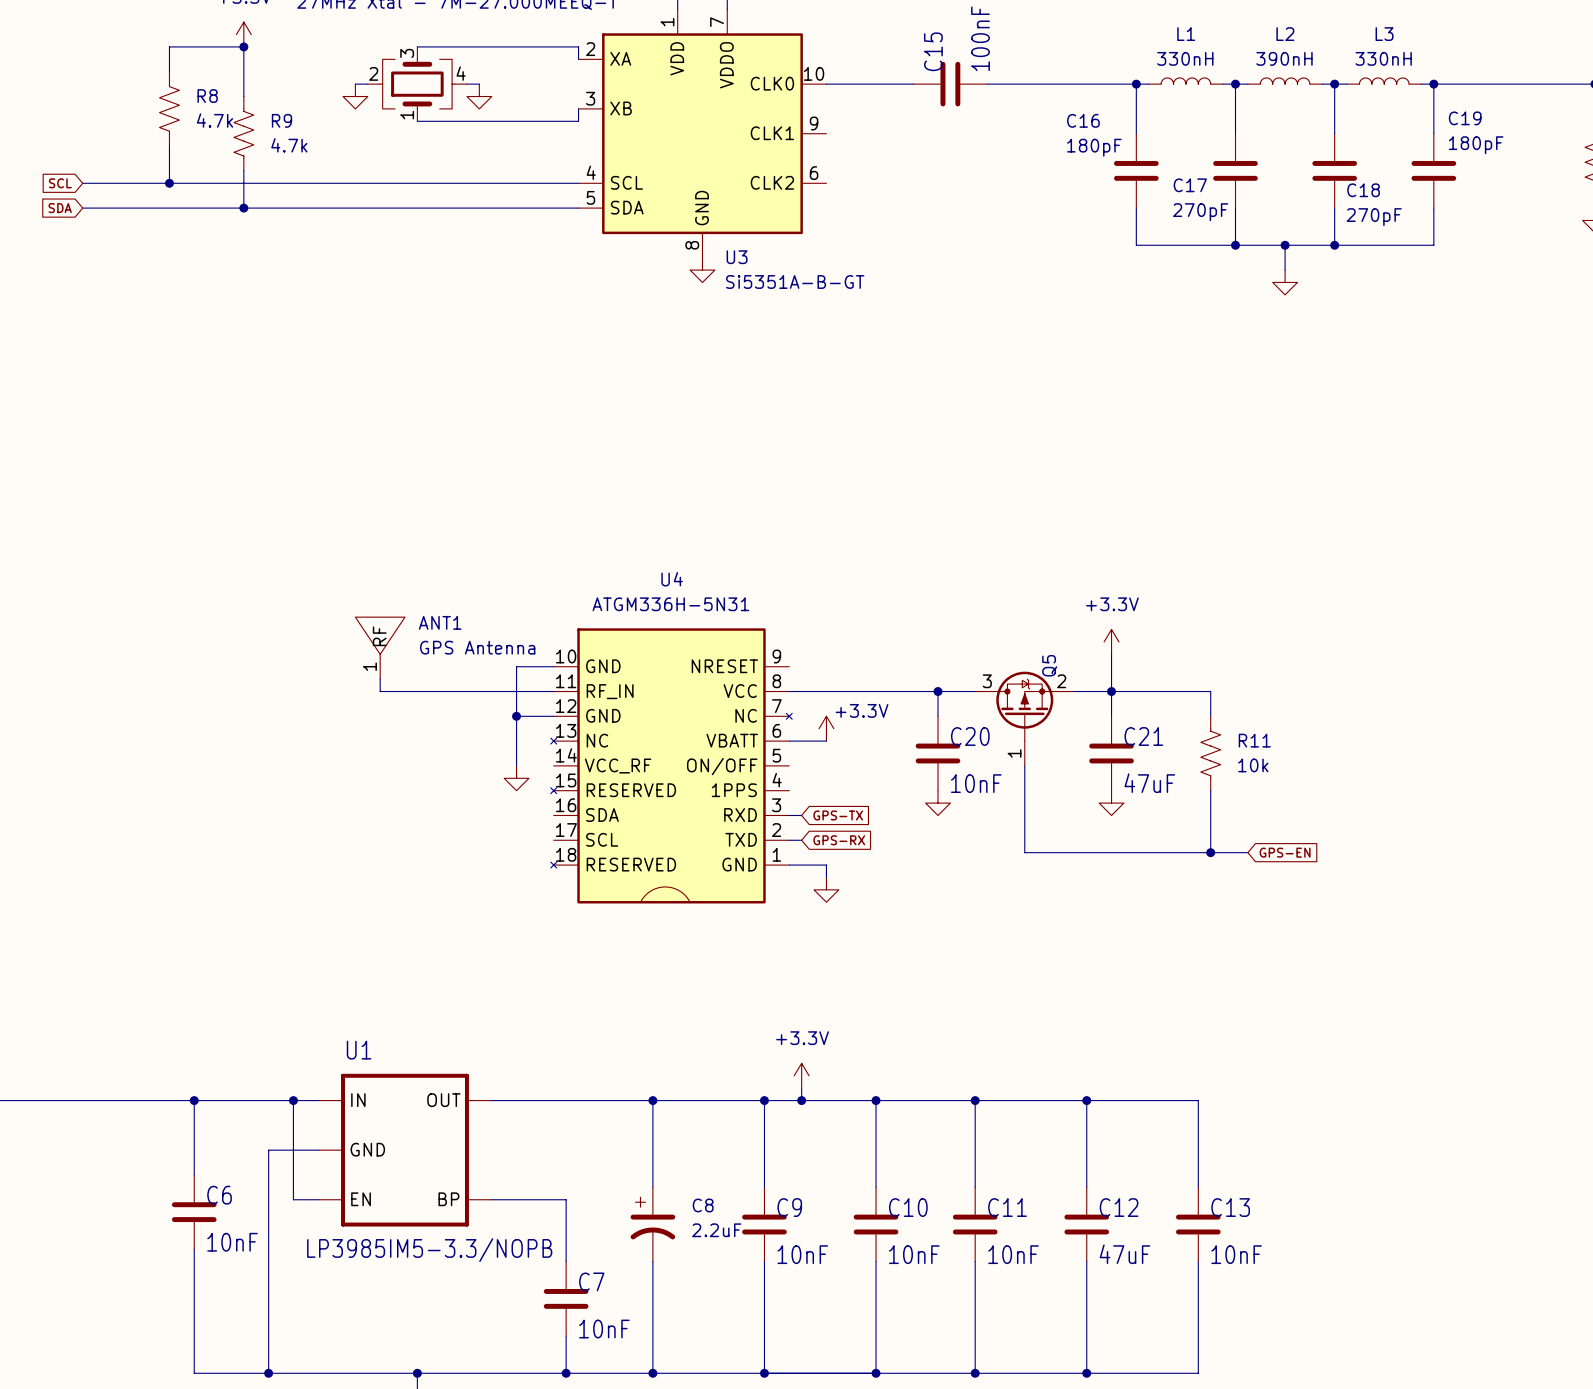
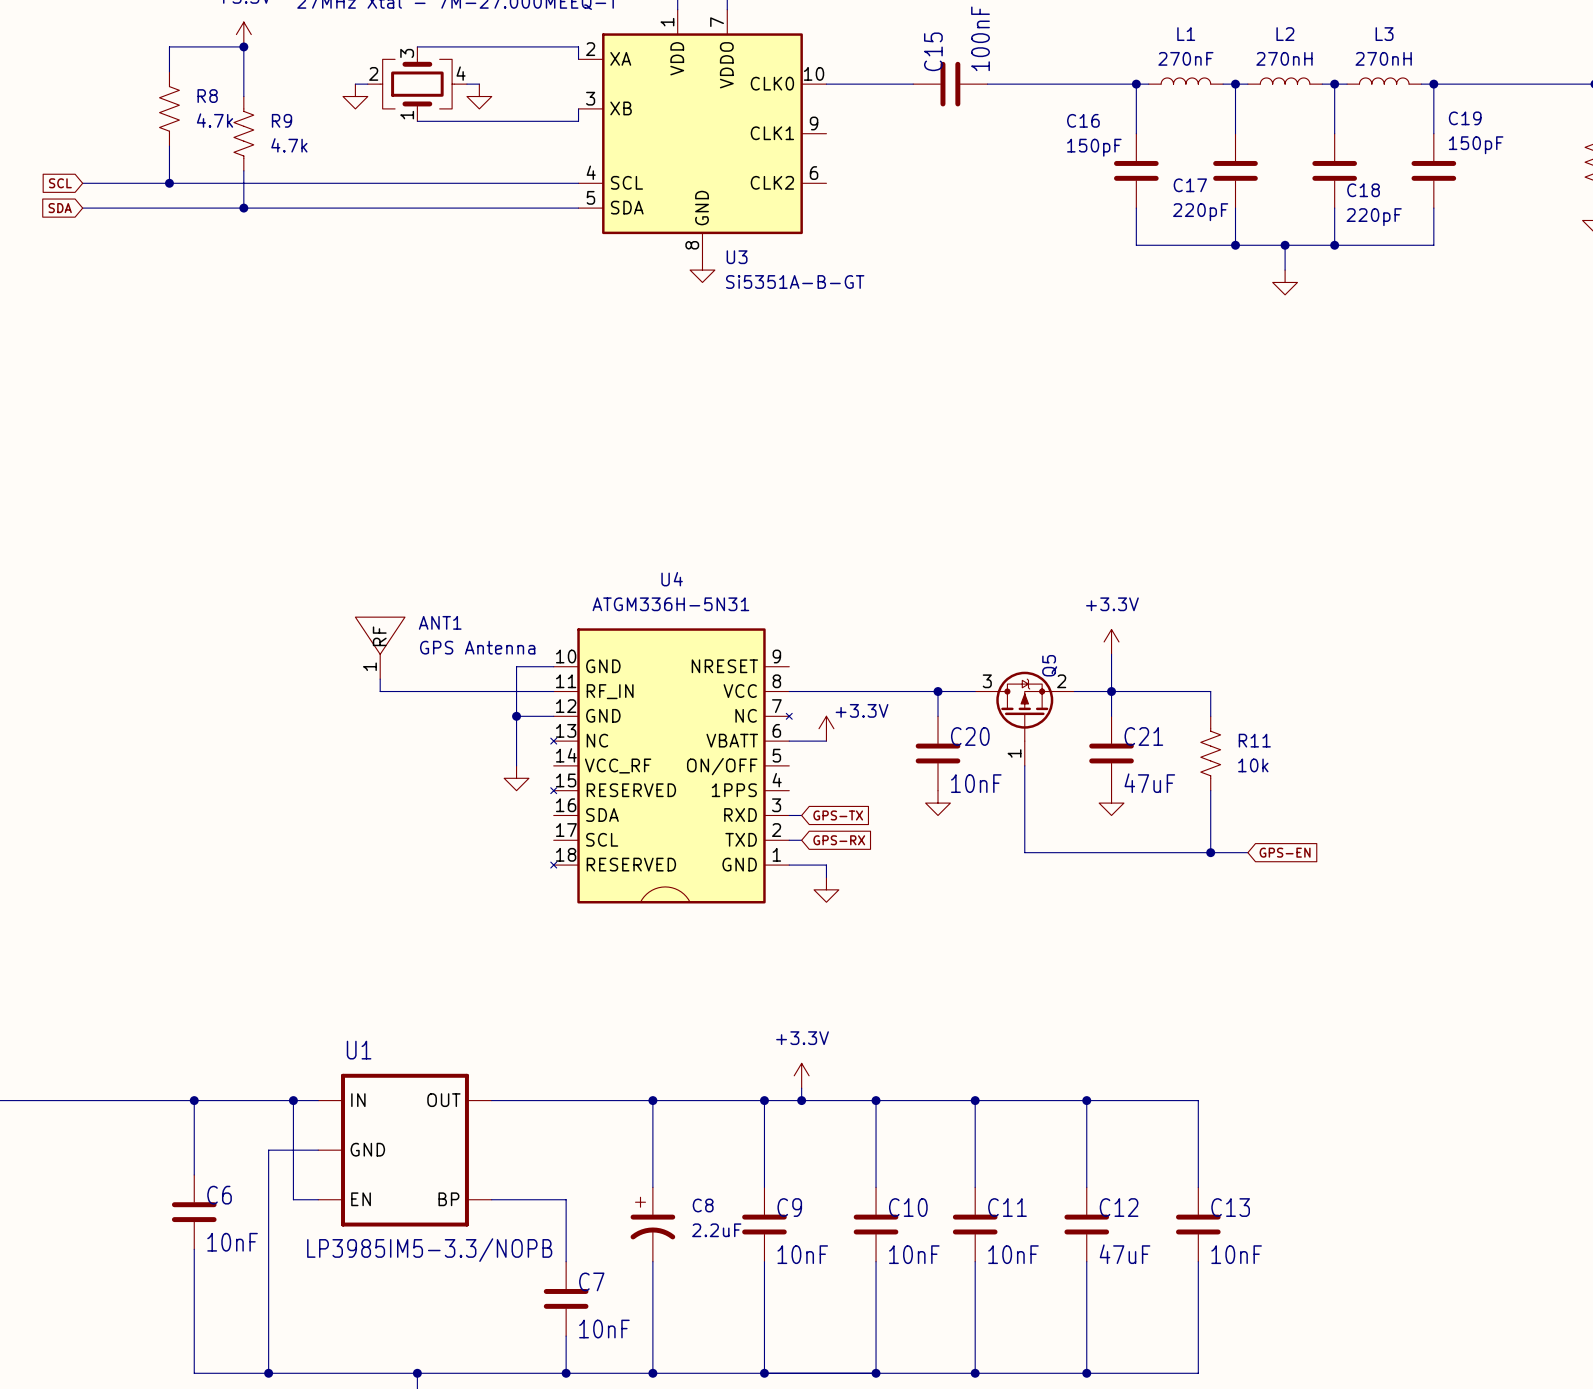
L1 value: 330nH (1185, 58) -> 270nF (1185, 58)
L2 value: 390nH (1284, 58) -> 270nH (1284, 58)
L3 value: 330nH (1383, 58) -> 270nH (1383, 58)
C19 value: 180pF (1476, 145) -> 150pF (1476, 145)
C16 value: 180pF (1094, 147) -> 150pF (1094, 147)
C17 value: 270pF (1200, 212) -> 220pF (1200, 212)
C18 value: 270pF (1374, 217) -> 220pF (1374, 217)

